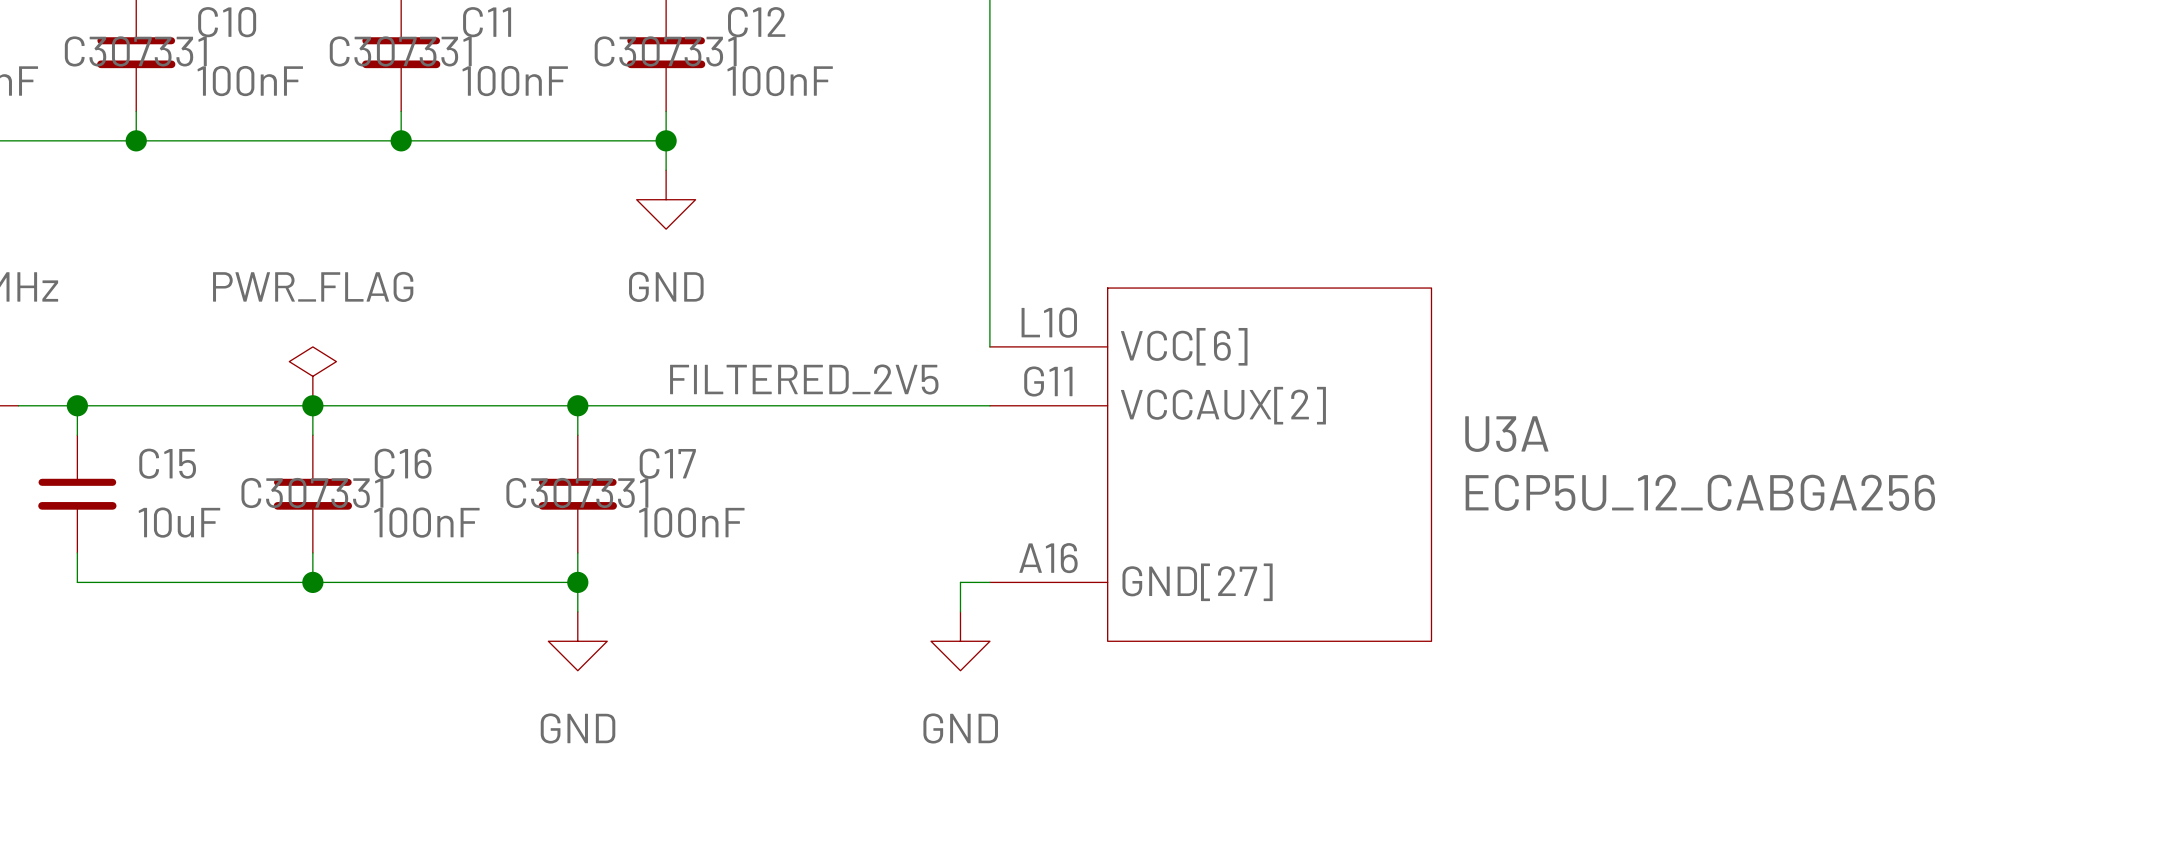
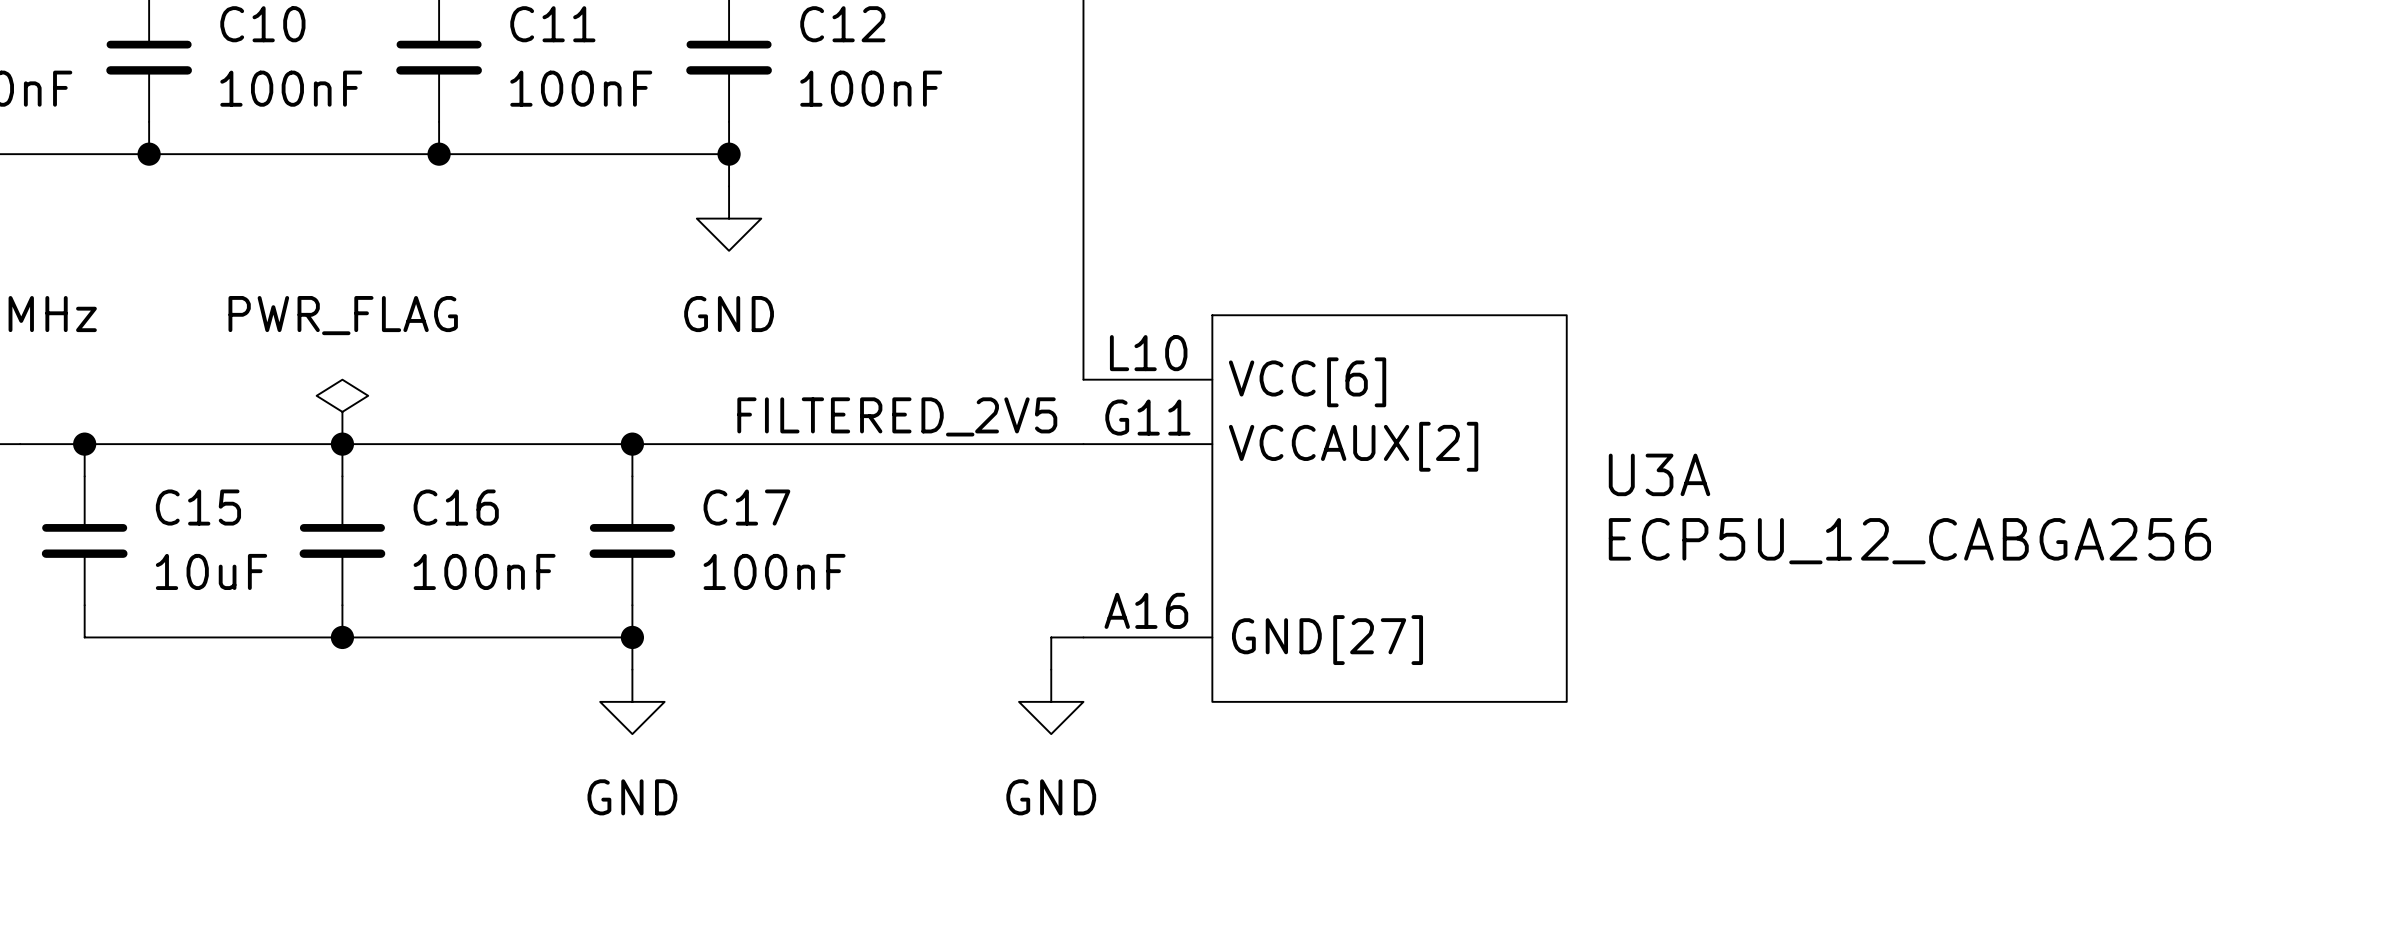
C10 text: C307331 (135, 51) -> none
C11 text: C307331 (400, 51) -> none
C12 text: C307331 (665, 51) -> none
C16 text: C307331 (312, 493) -> none
C17 text: C307331 (577, 493) -> none

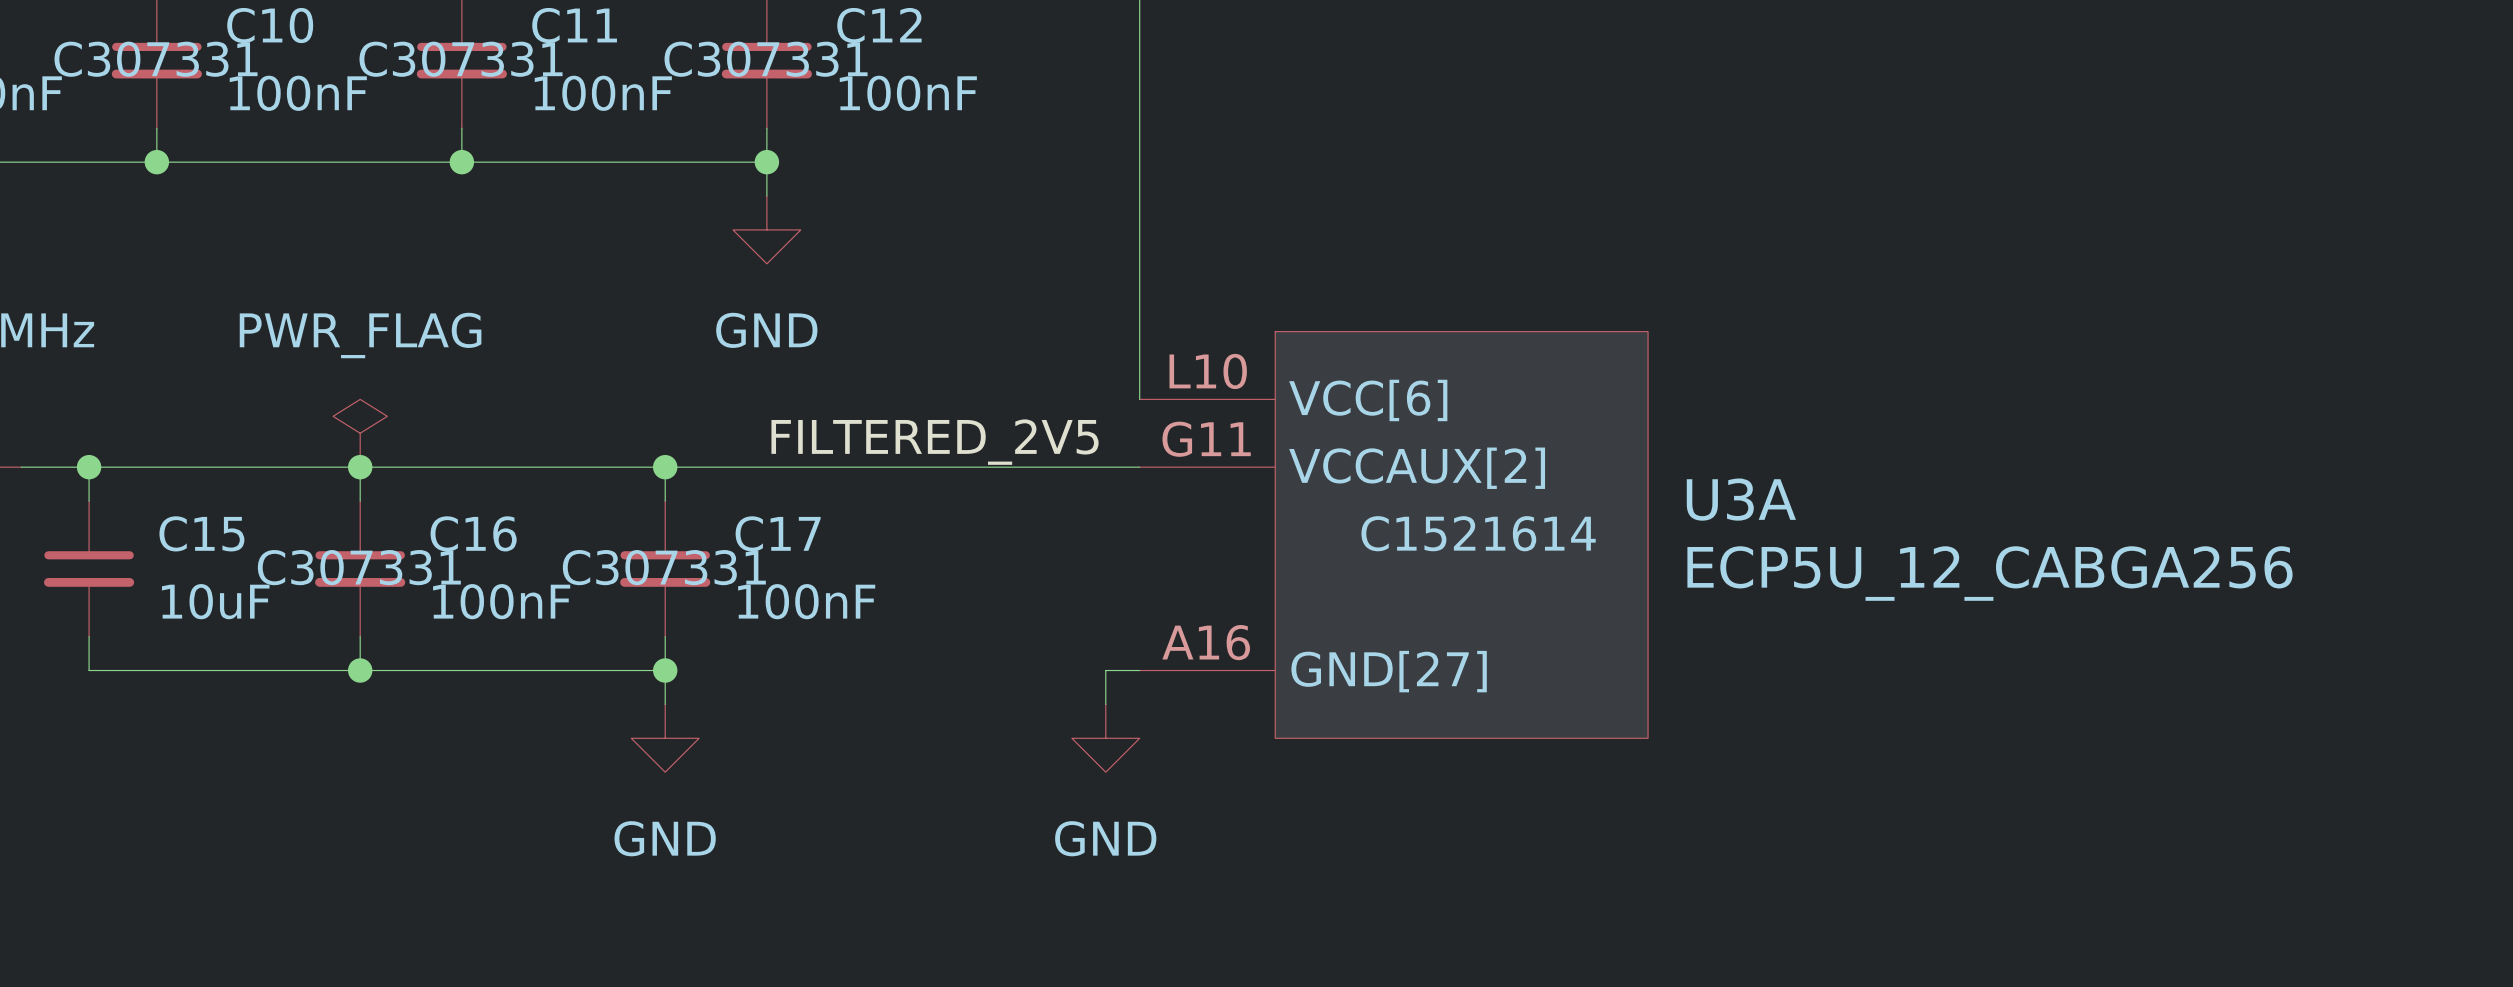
C10 text: none -> C307331 (156, 59)
C11 text: none -> C307331 (461, 59)
C12 text: none -> C307331 (766, 59)
U3A text: none -> C1521614 (1478, 533)
C16 text: none -> C307331 (359, 567)
C17 text: none -> C307331 (664, 567)

